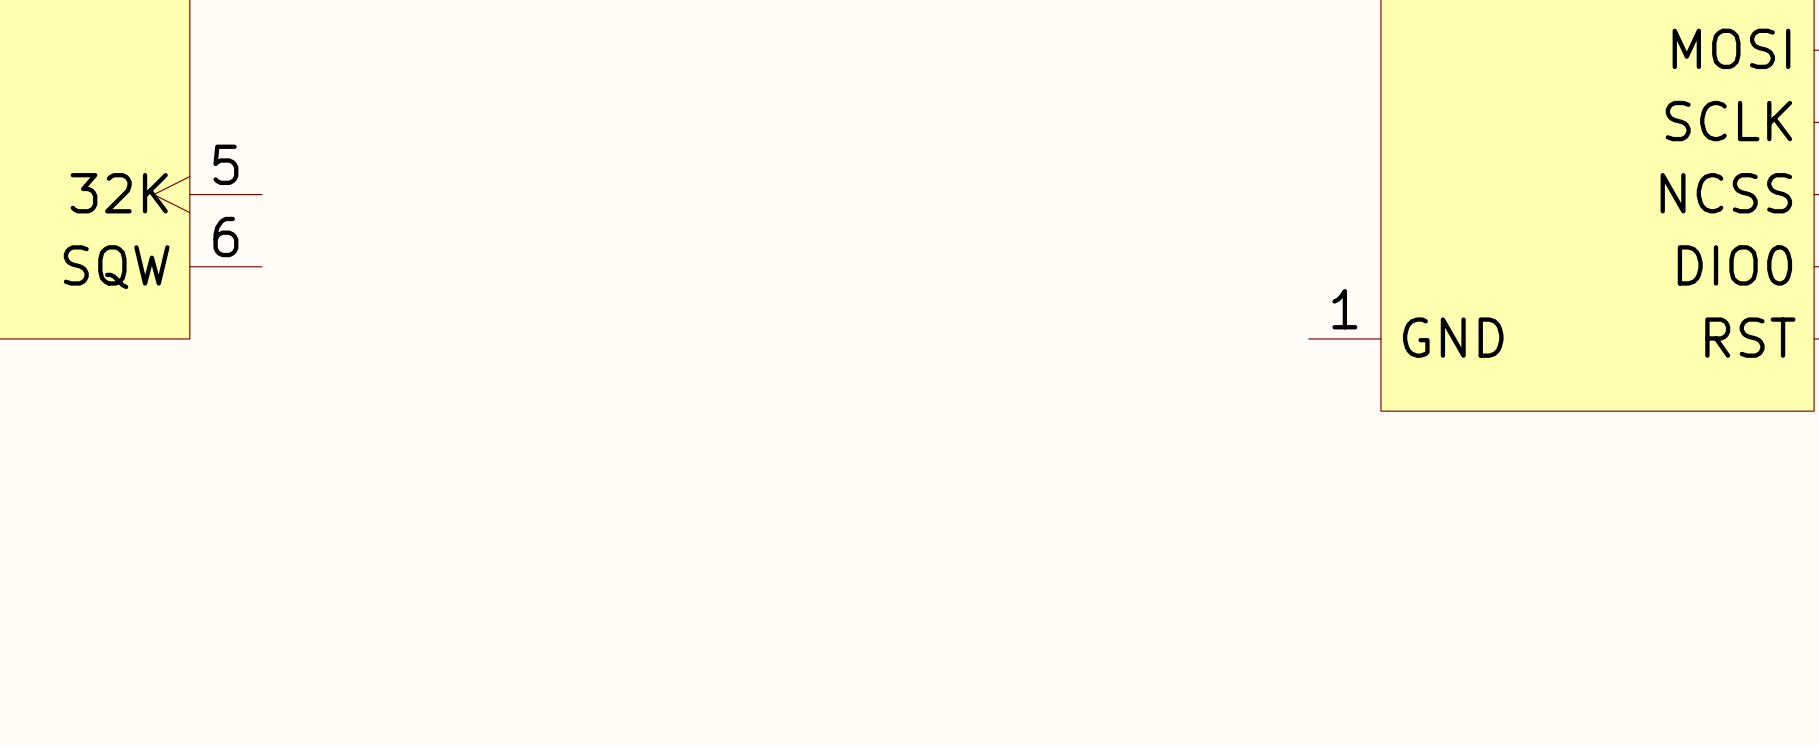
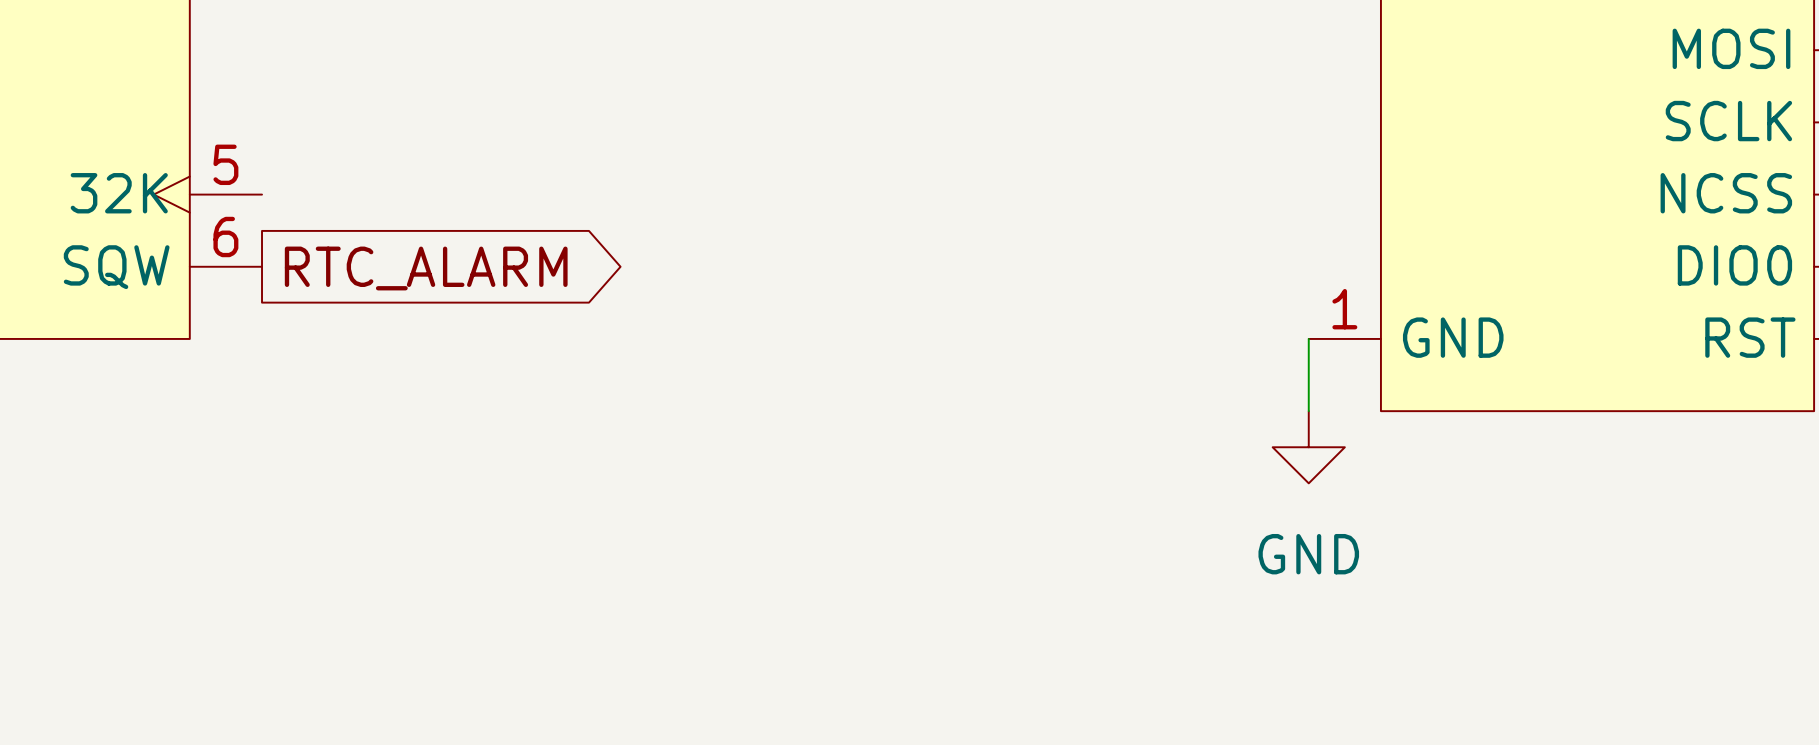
global label: none -> RTC_ALARM (426, 268)
wire: none -> (1308, 338) (1308, 411)
power symbol: none -> GND (1308, 447)

